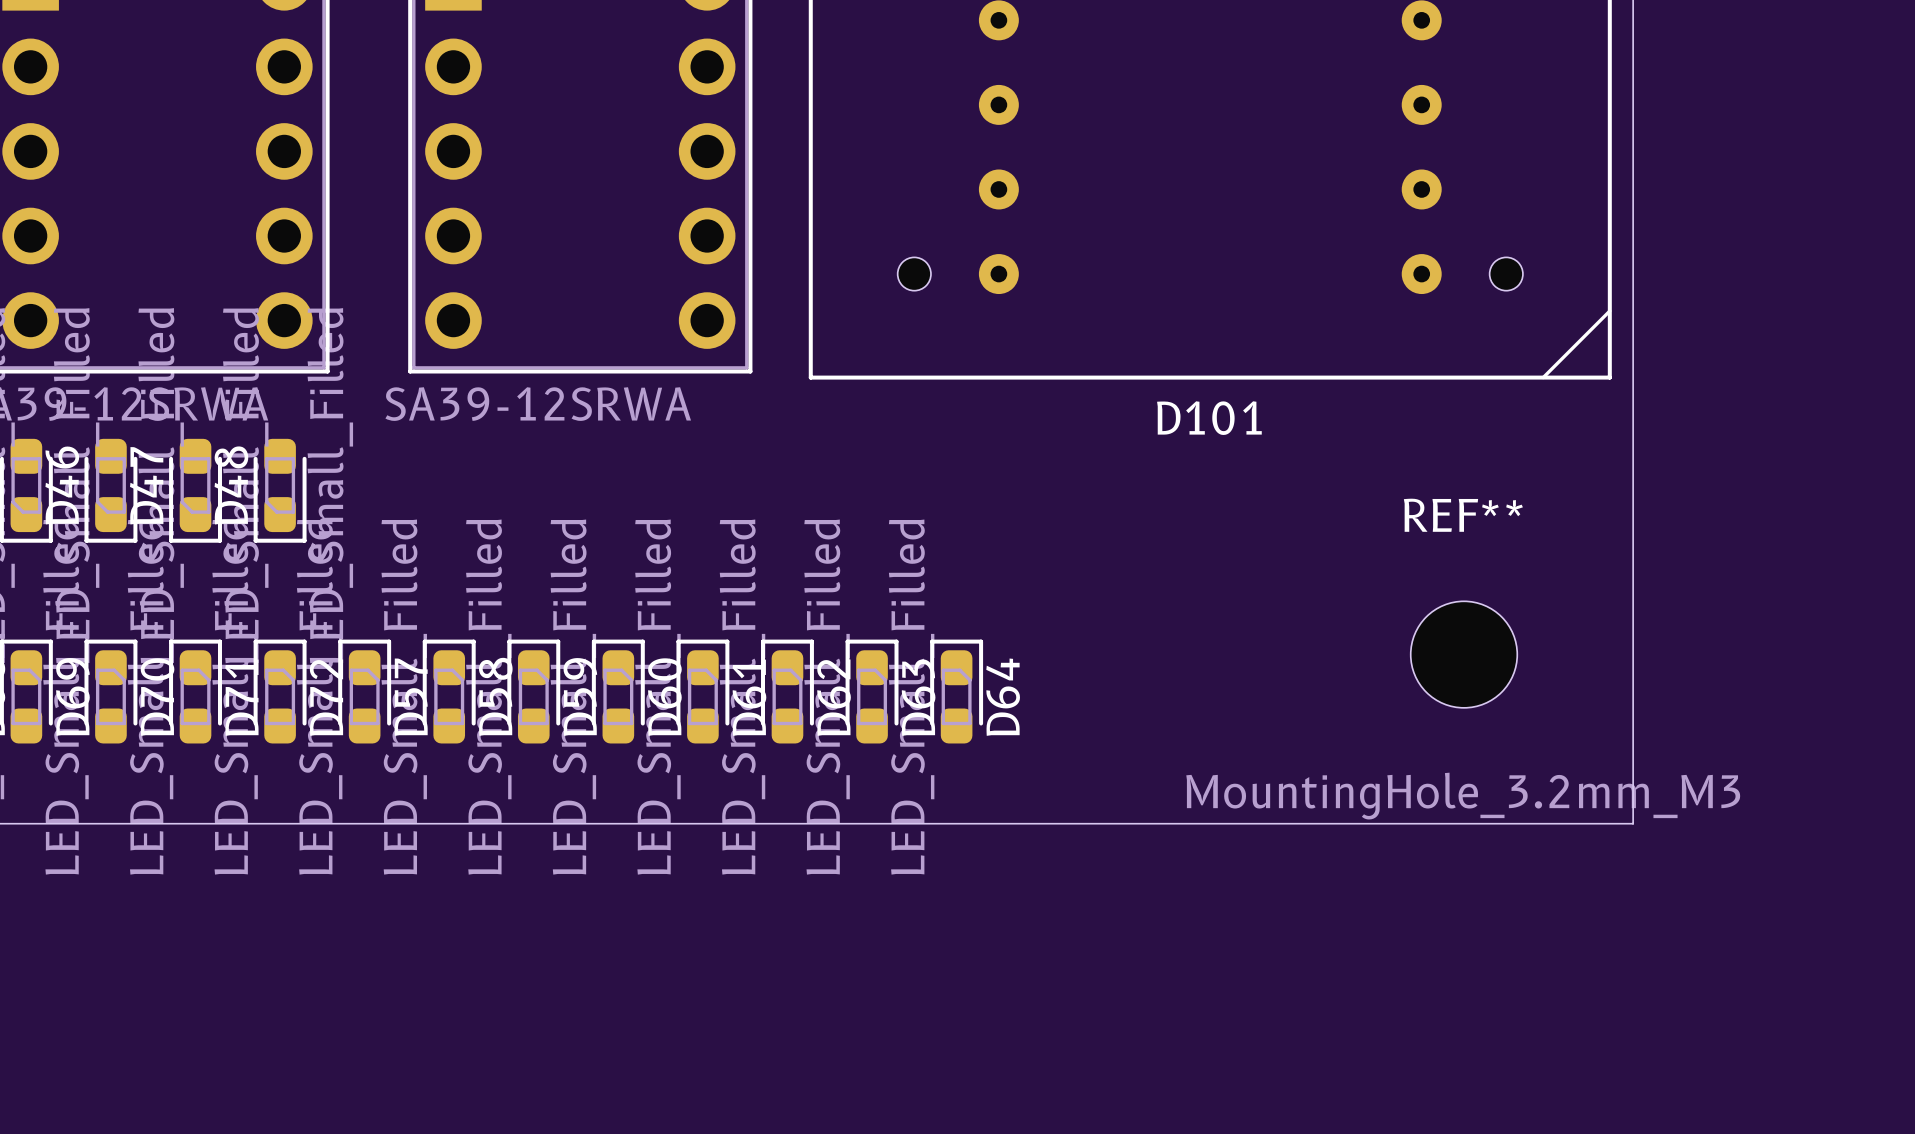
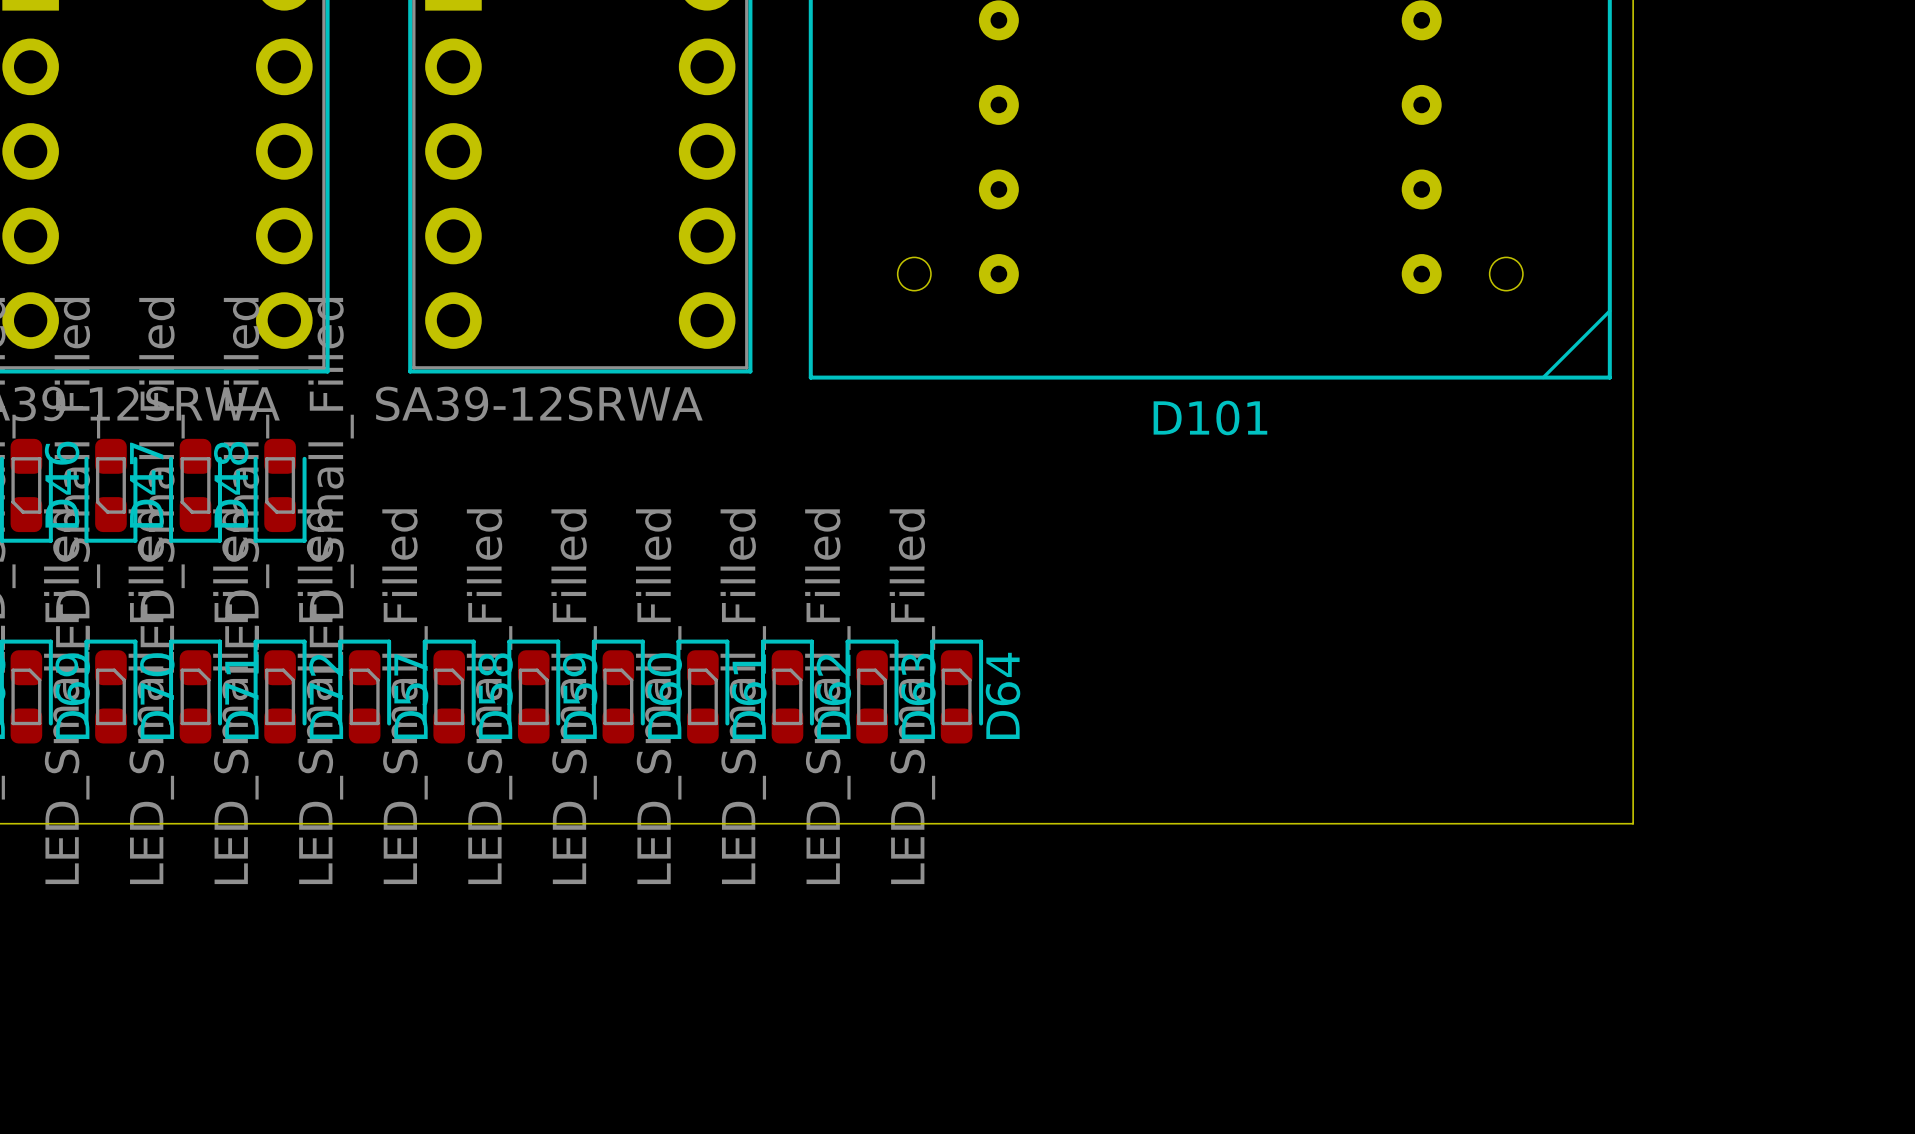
REF**: MountingHole_3.2mm_M3 (1464, 654) -> none

